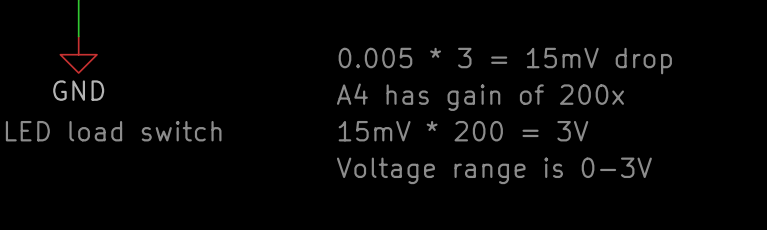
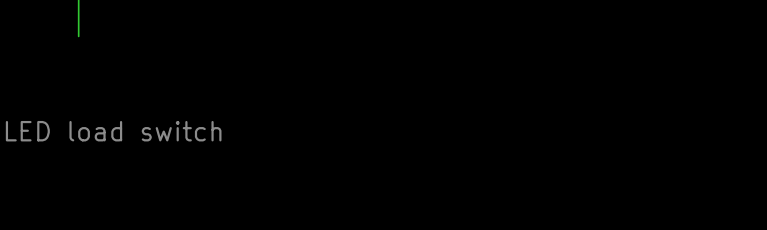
power symbol: GND (78, 54) -> none
text: 0.005 * 3 = 15mV drop (505, 61) -> none
text: A4 has gain of 200x (480, 97) -> none
text: 15mV * 200 = 3V (463, 131) -> none
text: Voltage range is 0-3V (494, 170) -> none

